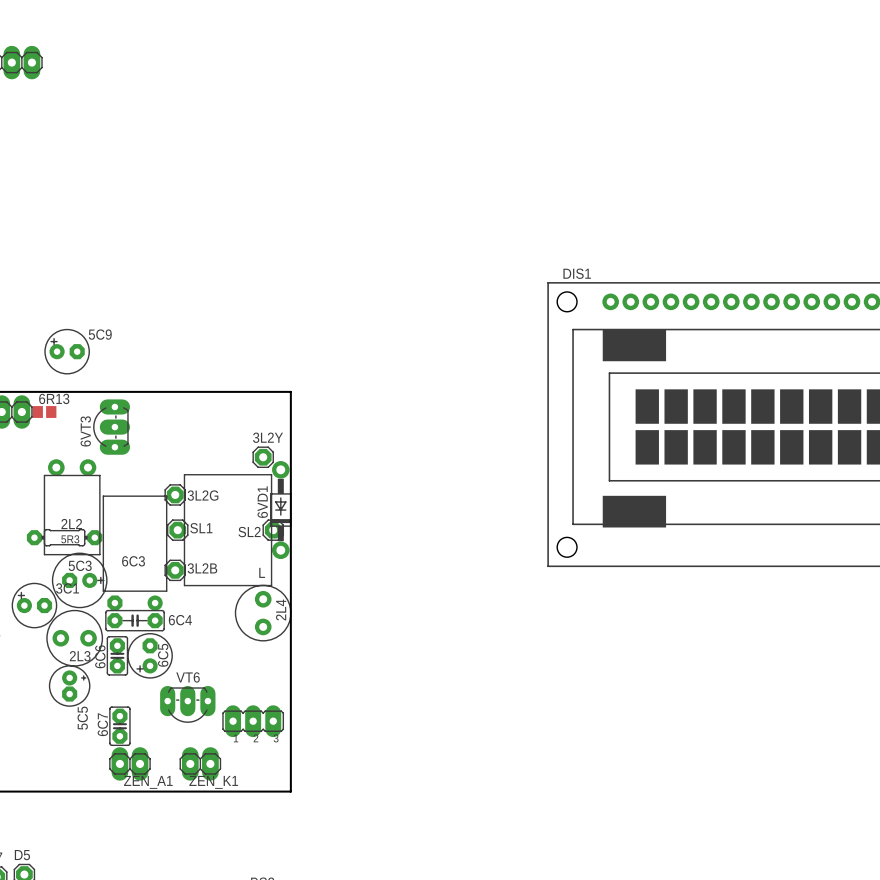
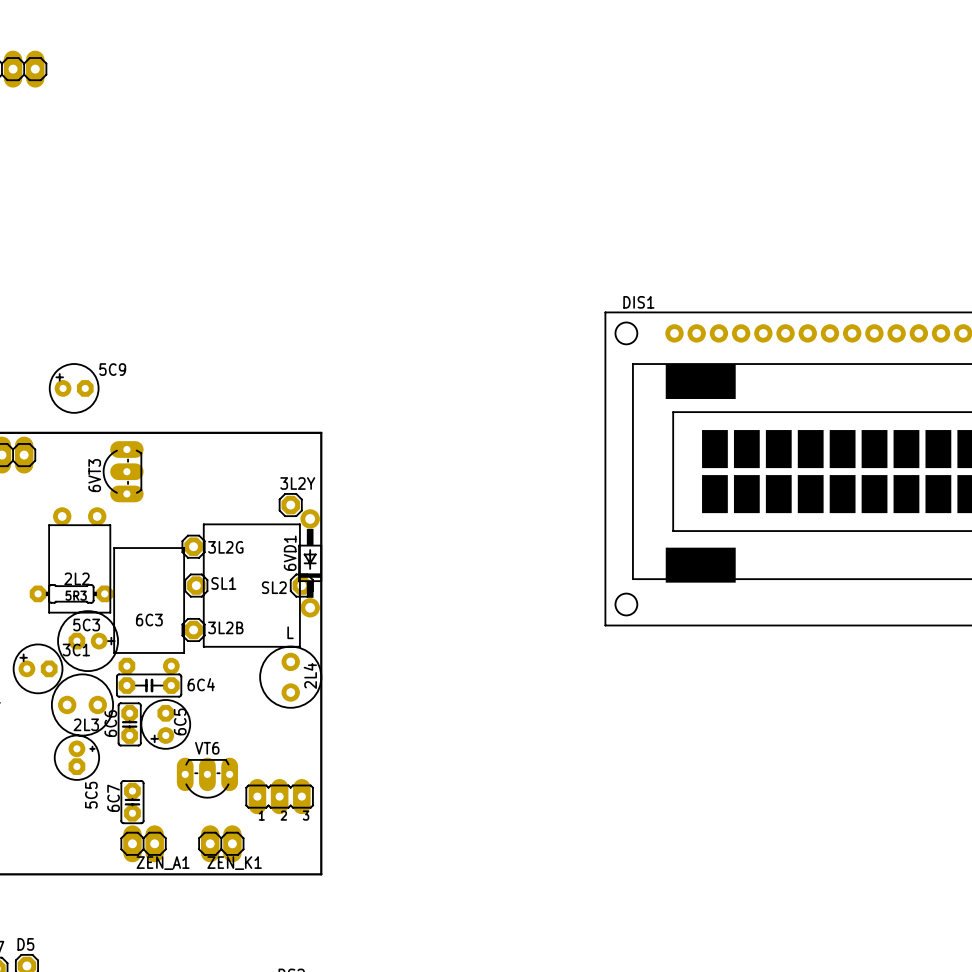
6R13: (44, 412) -> none

